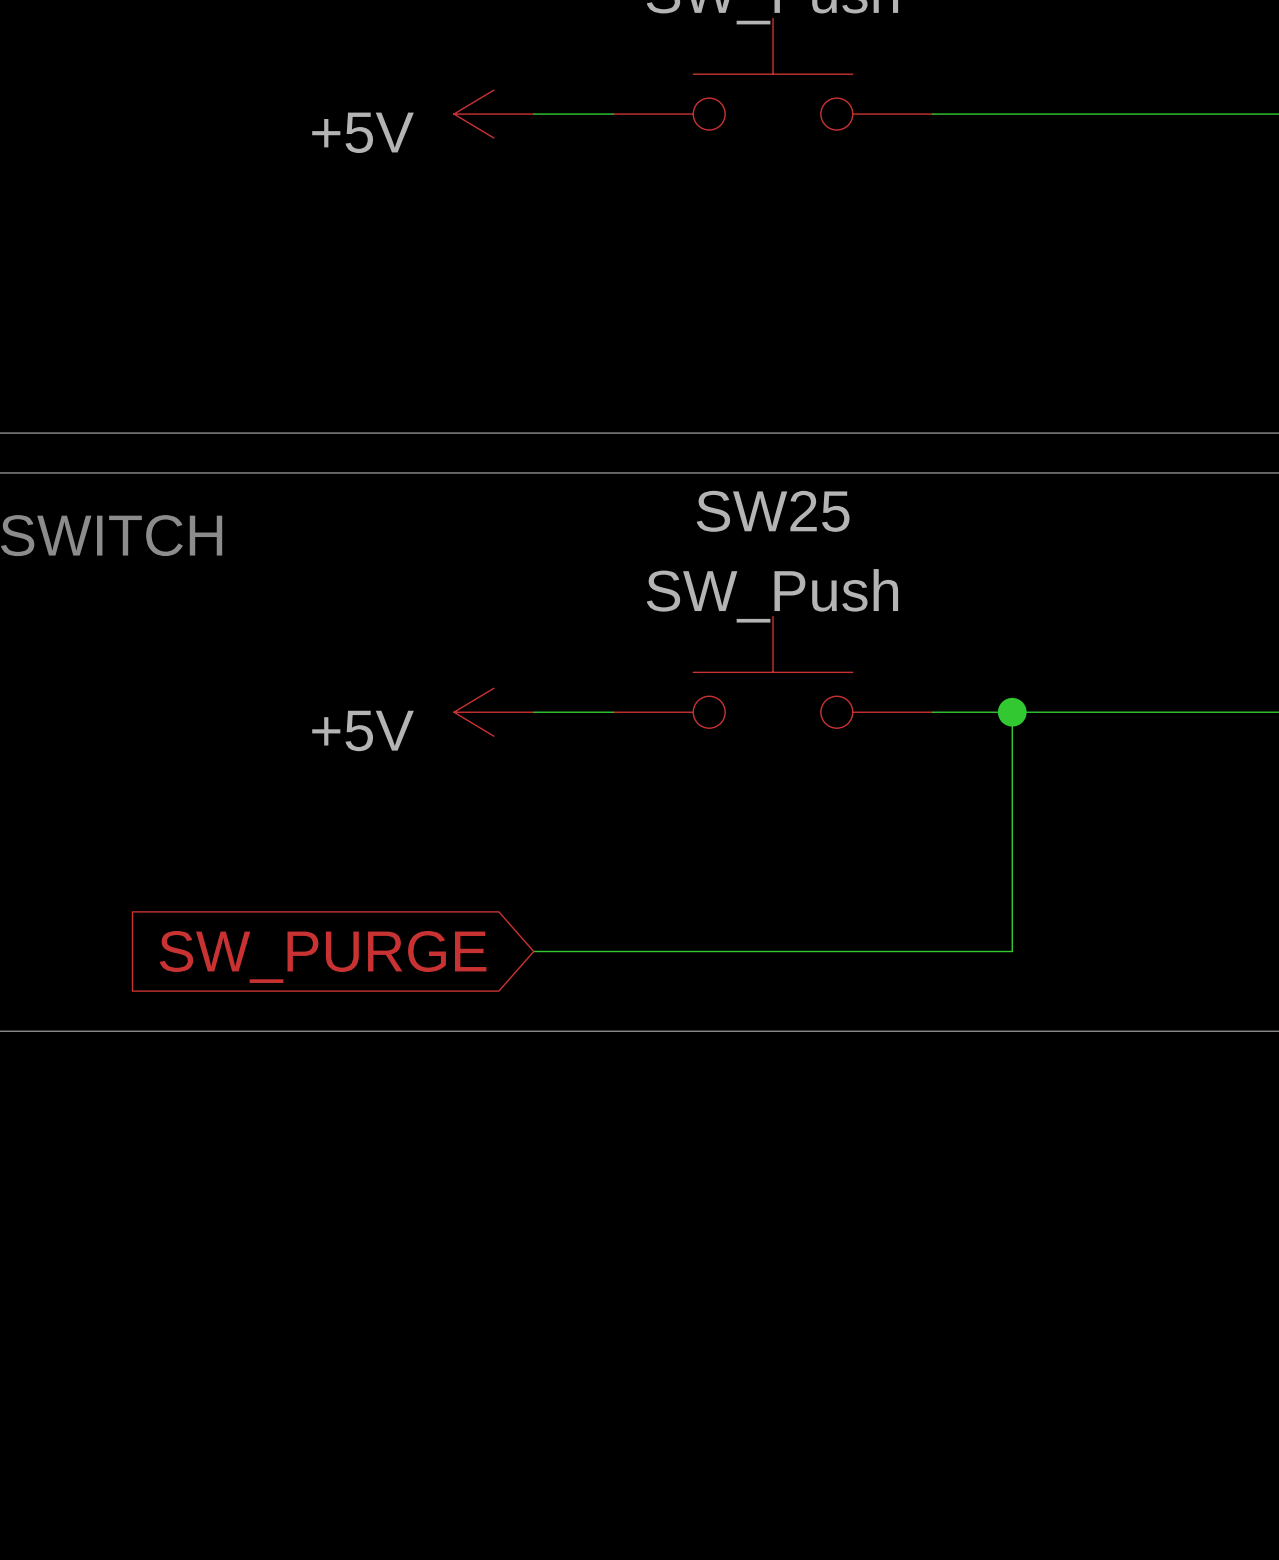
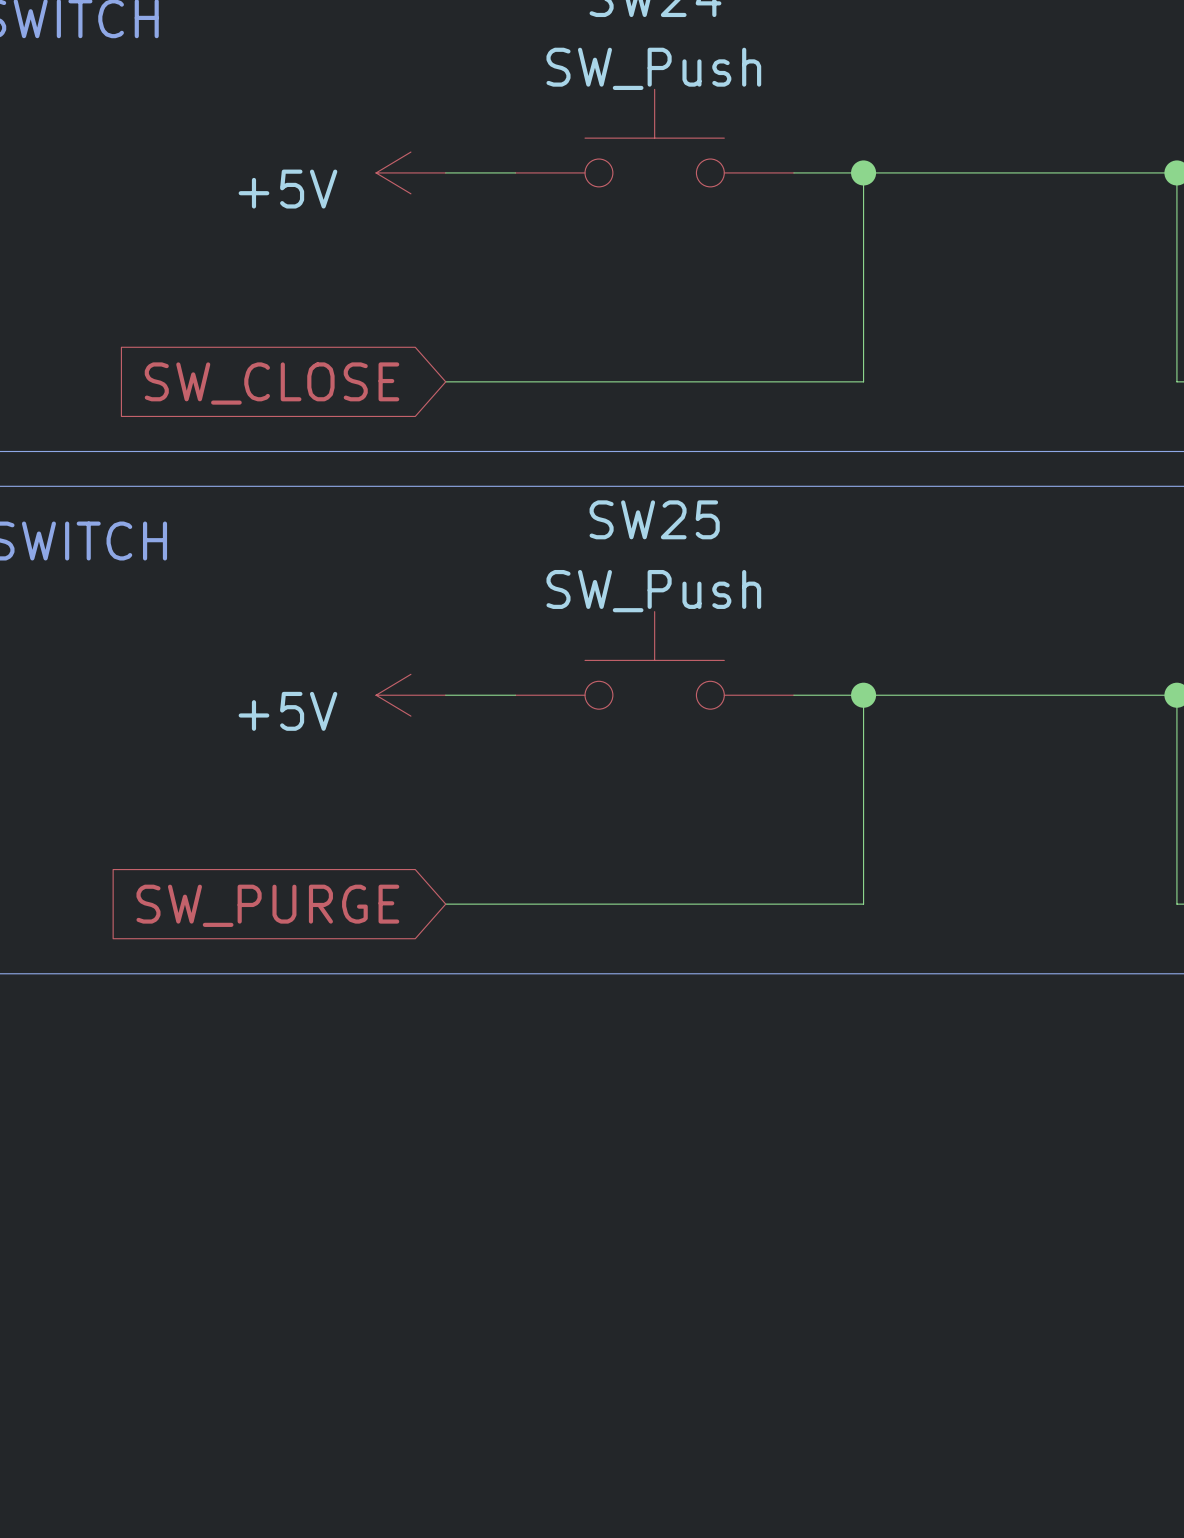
wire: none -> (863, 172) (863, 381) (445, 381)
junction: none -> (863, 172)
global label: none -> SW_CLOSE (272, 383)

